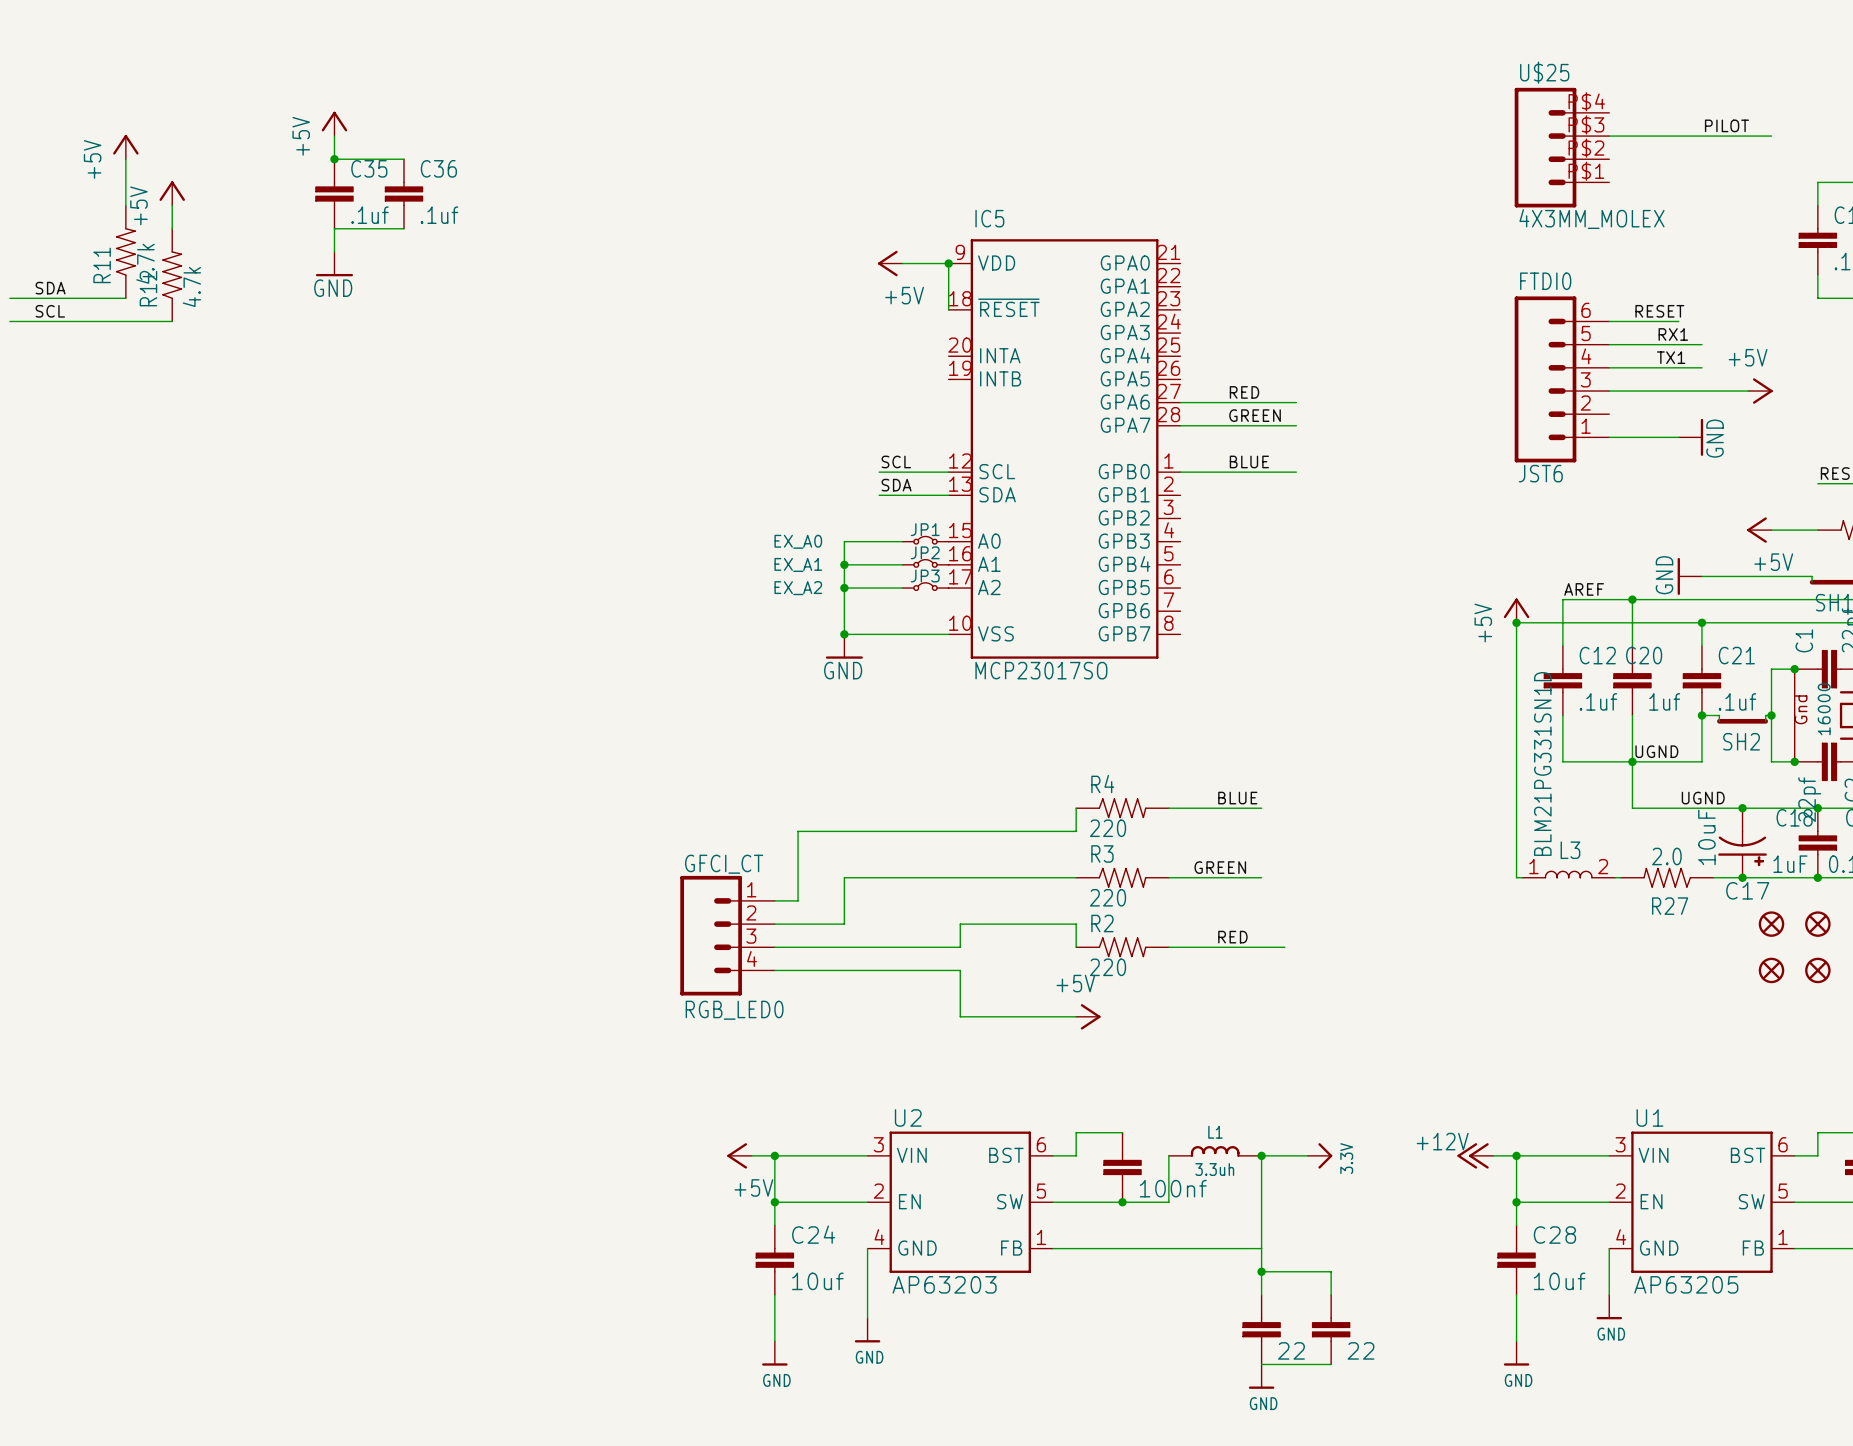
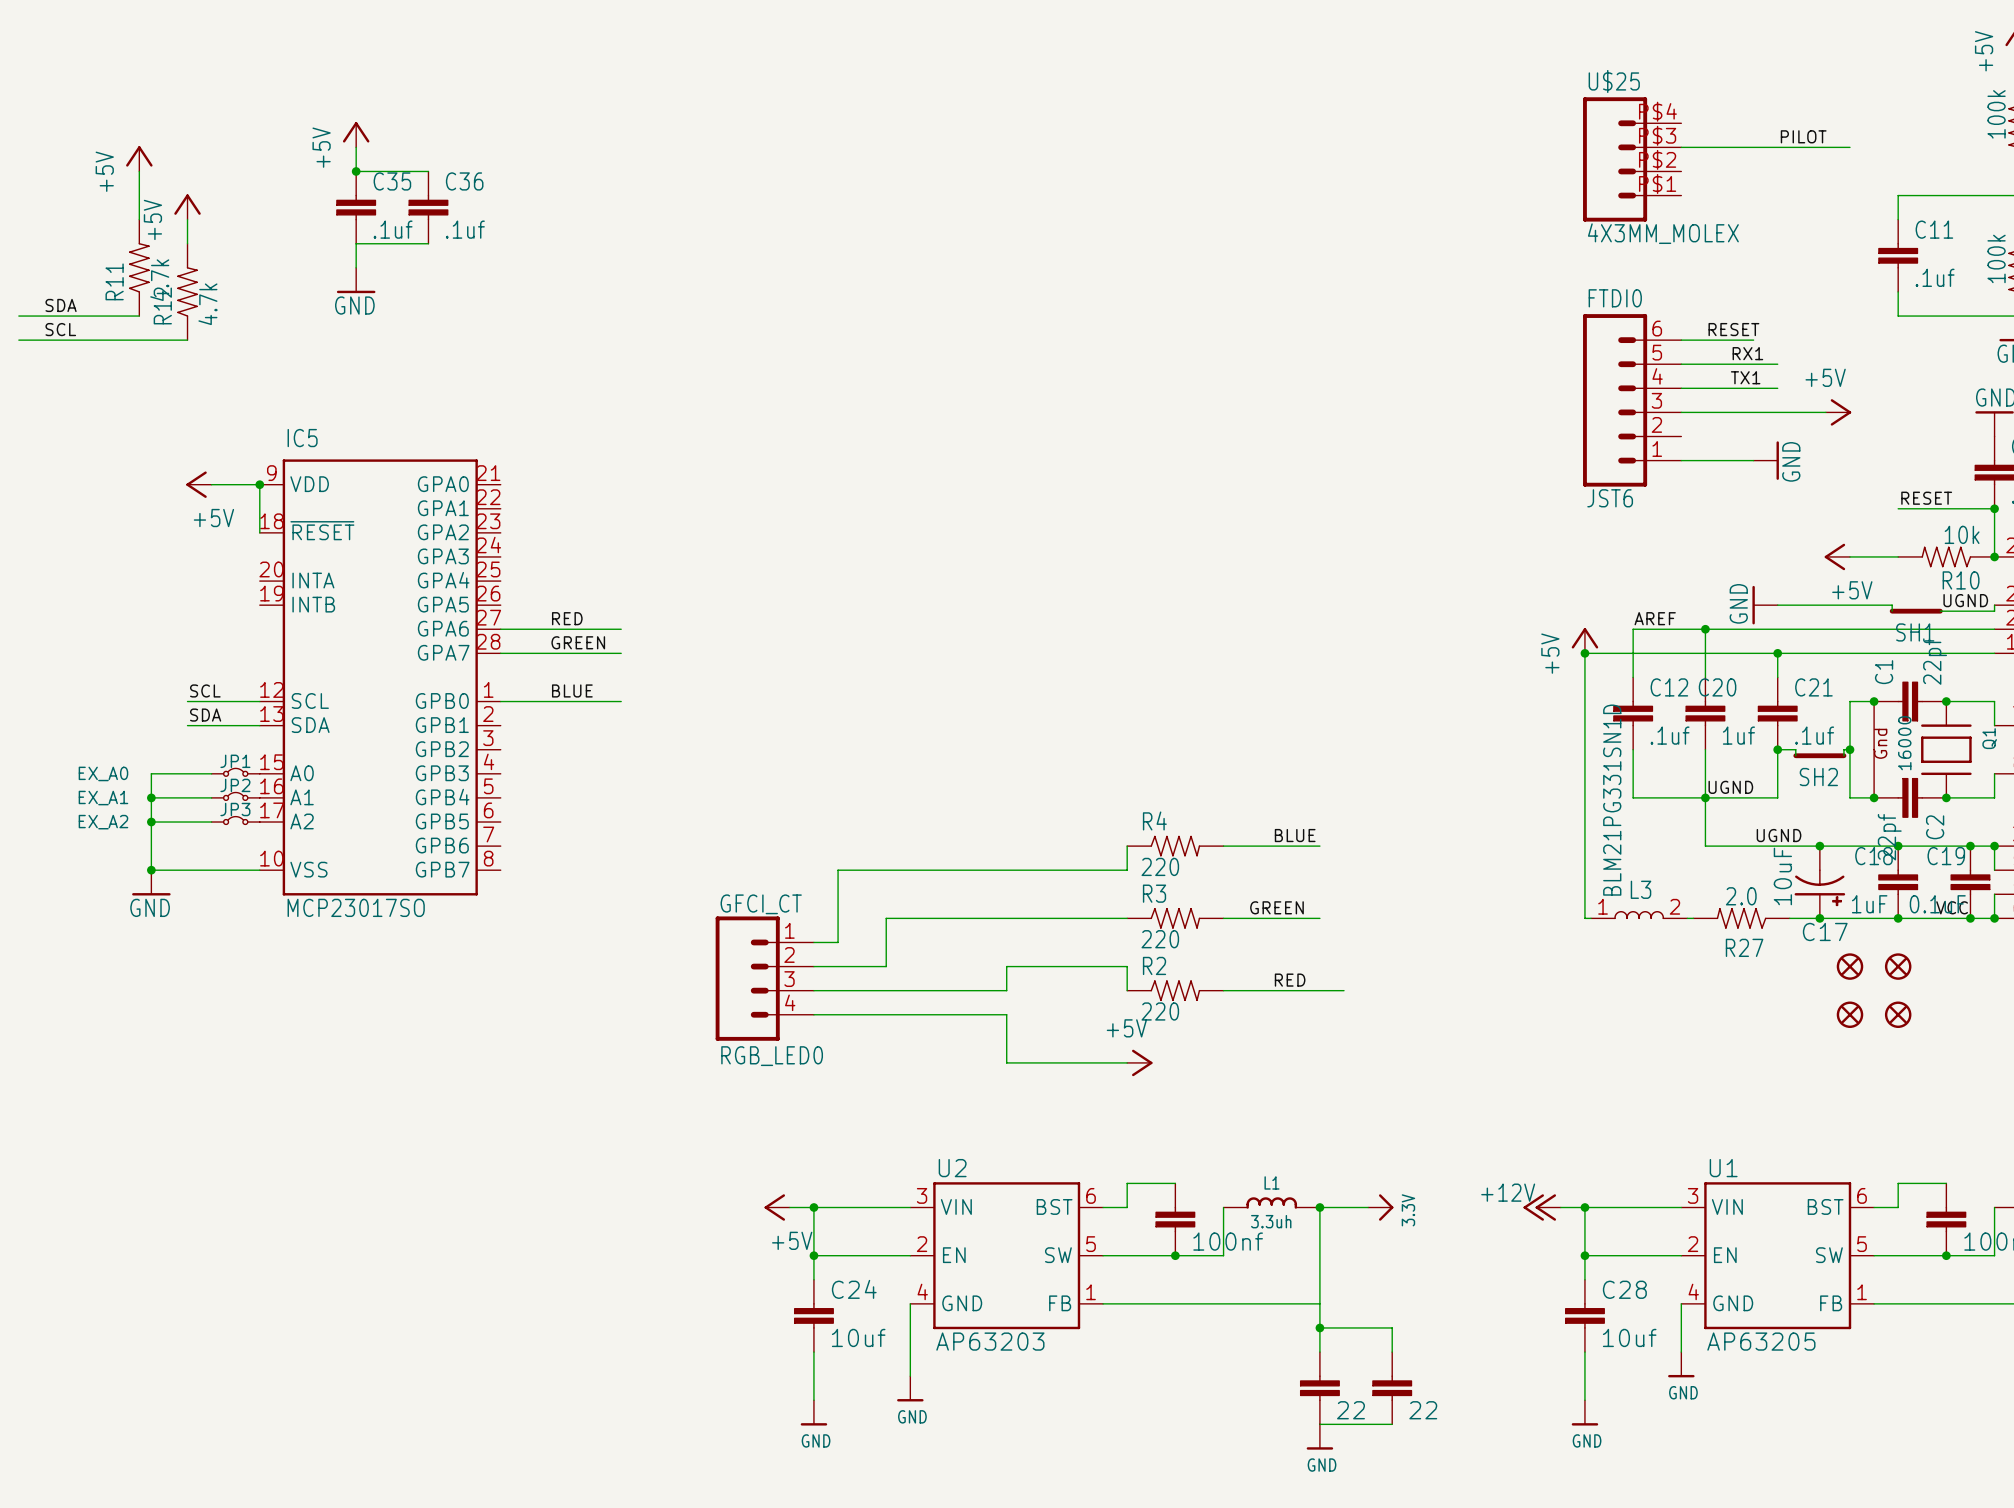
power symbol: +5V (890, 263) -> none
wire: (902, 263) (948, 263) (948, 309) -> none
junction: (948, 263) -> none
label: RED (1244, 392) -> none
wire: (1180, 402) (1296, 402) -> none
label: GREEN (1255, 415) -> none
wire: (1180, 425) (1296, 425) -> none
IC5 position: (1064, 448) -> (380, 677)
power symbol: none -> +5V (198, 484)
wire: none -> (211, 484) (259, 484) (259, 532)
junction: none -> (259, 484)
label: SCL (896, 461) -> none
label: BLUE (1249, 461) -> none
wire: (879, 472) (948, 472) -> none
wire: (1180, 472) (1296, 472) -> none
label: SDA (896, 485) -> none
wire: (879, 495) (948, 495) -> none
JP1 position: (925, 540) -> (235, 772)
wire: (902, 541) (844, 541) (844, 634) (948, 634) -> none
JP2 position: (925, 563) -> (235, 796)
wire: (844, 564) (902, 564) -> none
junction: (844, 564) -> none
JP3 position: (925, 586) -> (235, 820)
wire: (844, 588) (902, 588) -> none
junction: (844, 588) -> none
label: none -> RED (567, 618)
wire: none -> (500, 629) (621, 629)
label: none -> GREEN (578, 642)
wire: none -> (500, 653) (621, 653)
junction: (844, 634) -> none
power symbol: GND (844, 646) -> none
label: none -> SCL (205, 690)
label: none -> BLUE (572, 690)
wire: none -> (187, 701) (259, 701)
wire: none -> (500, 701) (621, 701)
label: none -> SDA (205, 715)
wire: none -> (187, 725) (259, 725)
wire: none -> (211, 773) (151, 773) (151, 870) (259, 870)
wire: none -> (151, 797) (211, 797)
junction: none -> (151, 797)
wire: none -> (151, 822) (211, 822)
junction: none -> (151, 822)
junction: none -> (151, 870)
power symbol: none -> GND (151, 882)

